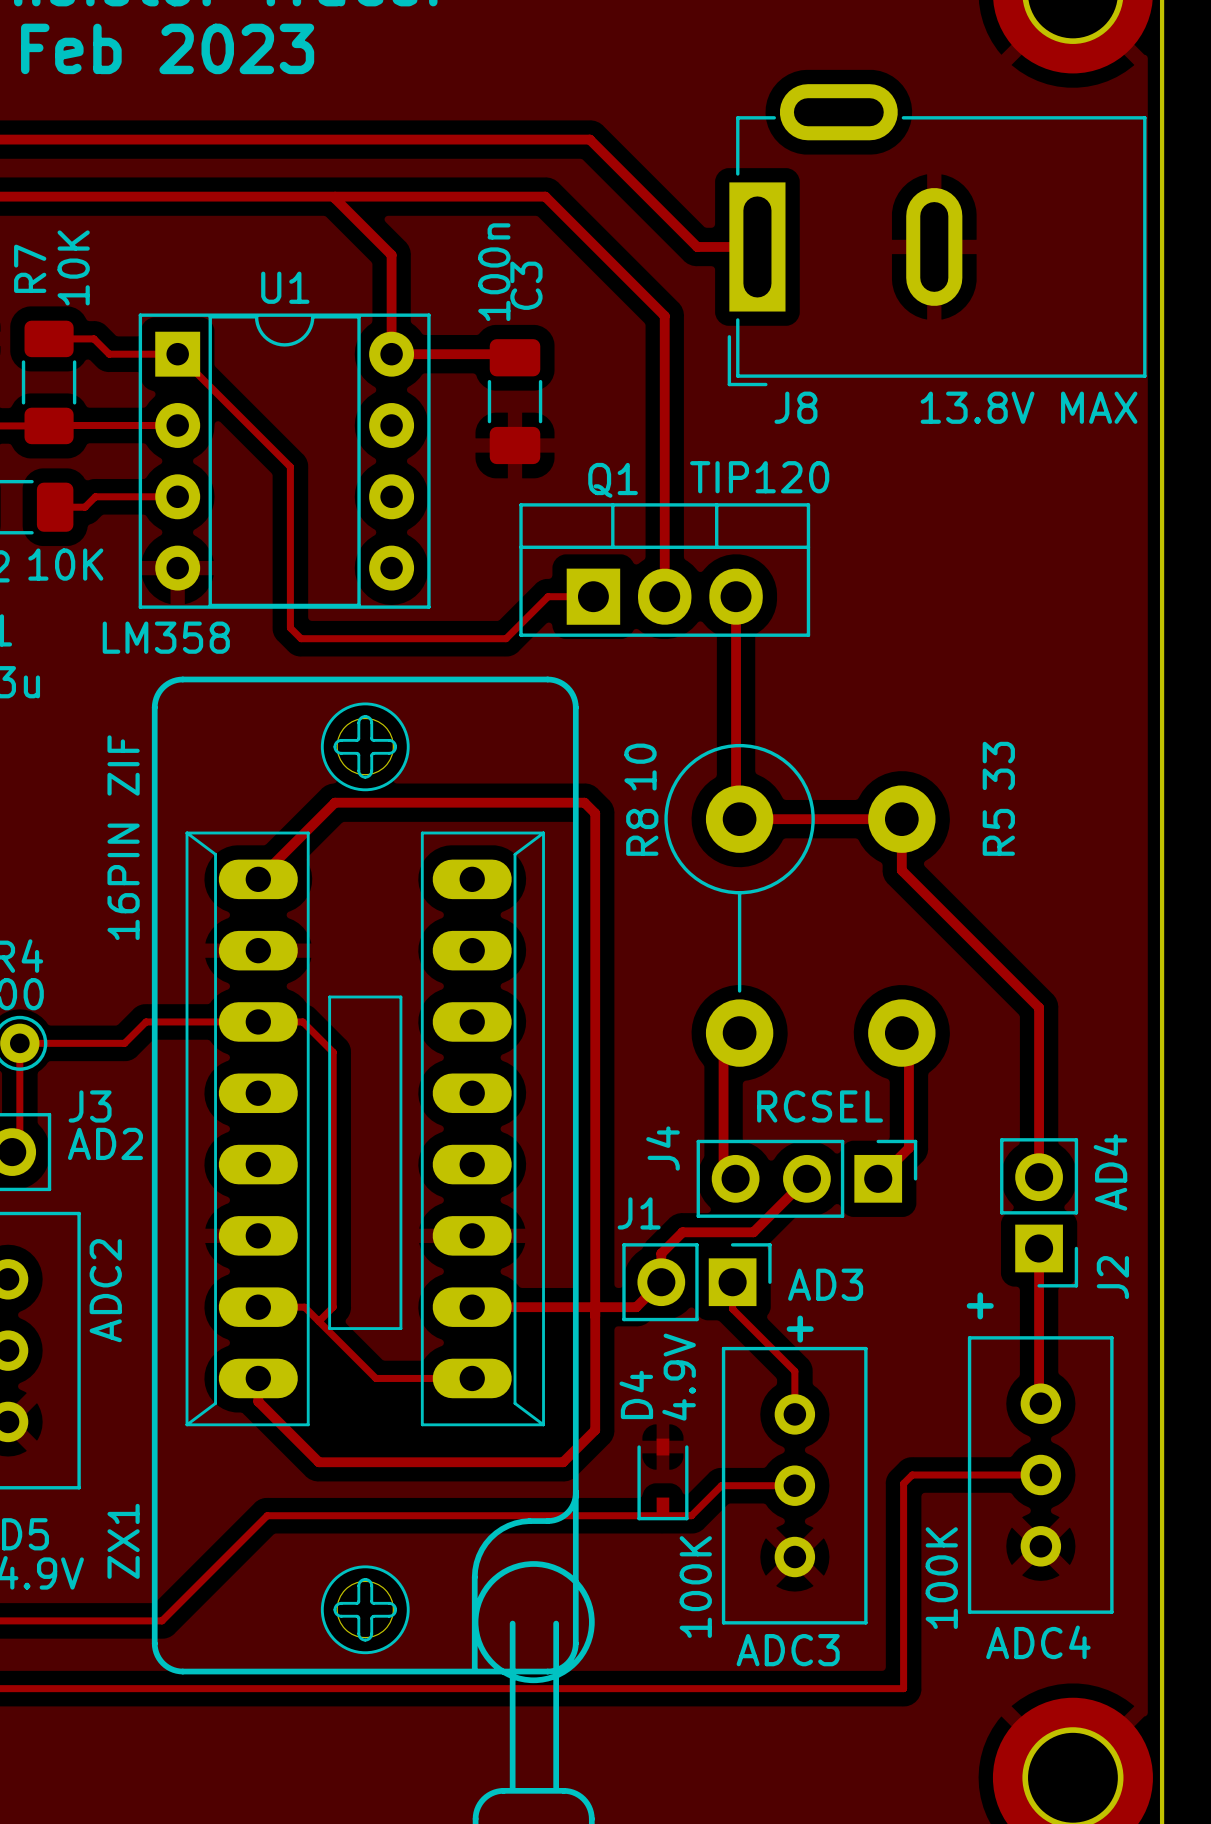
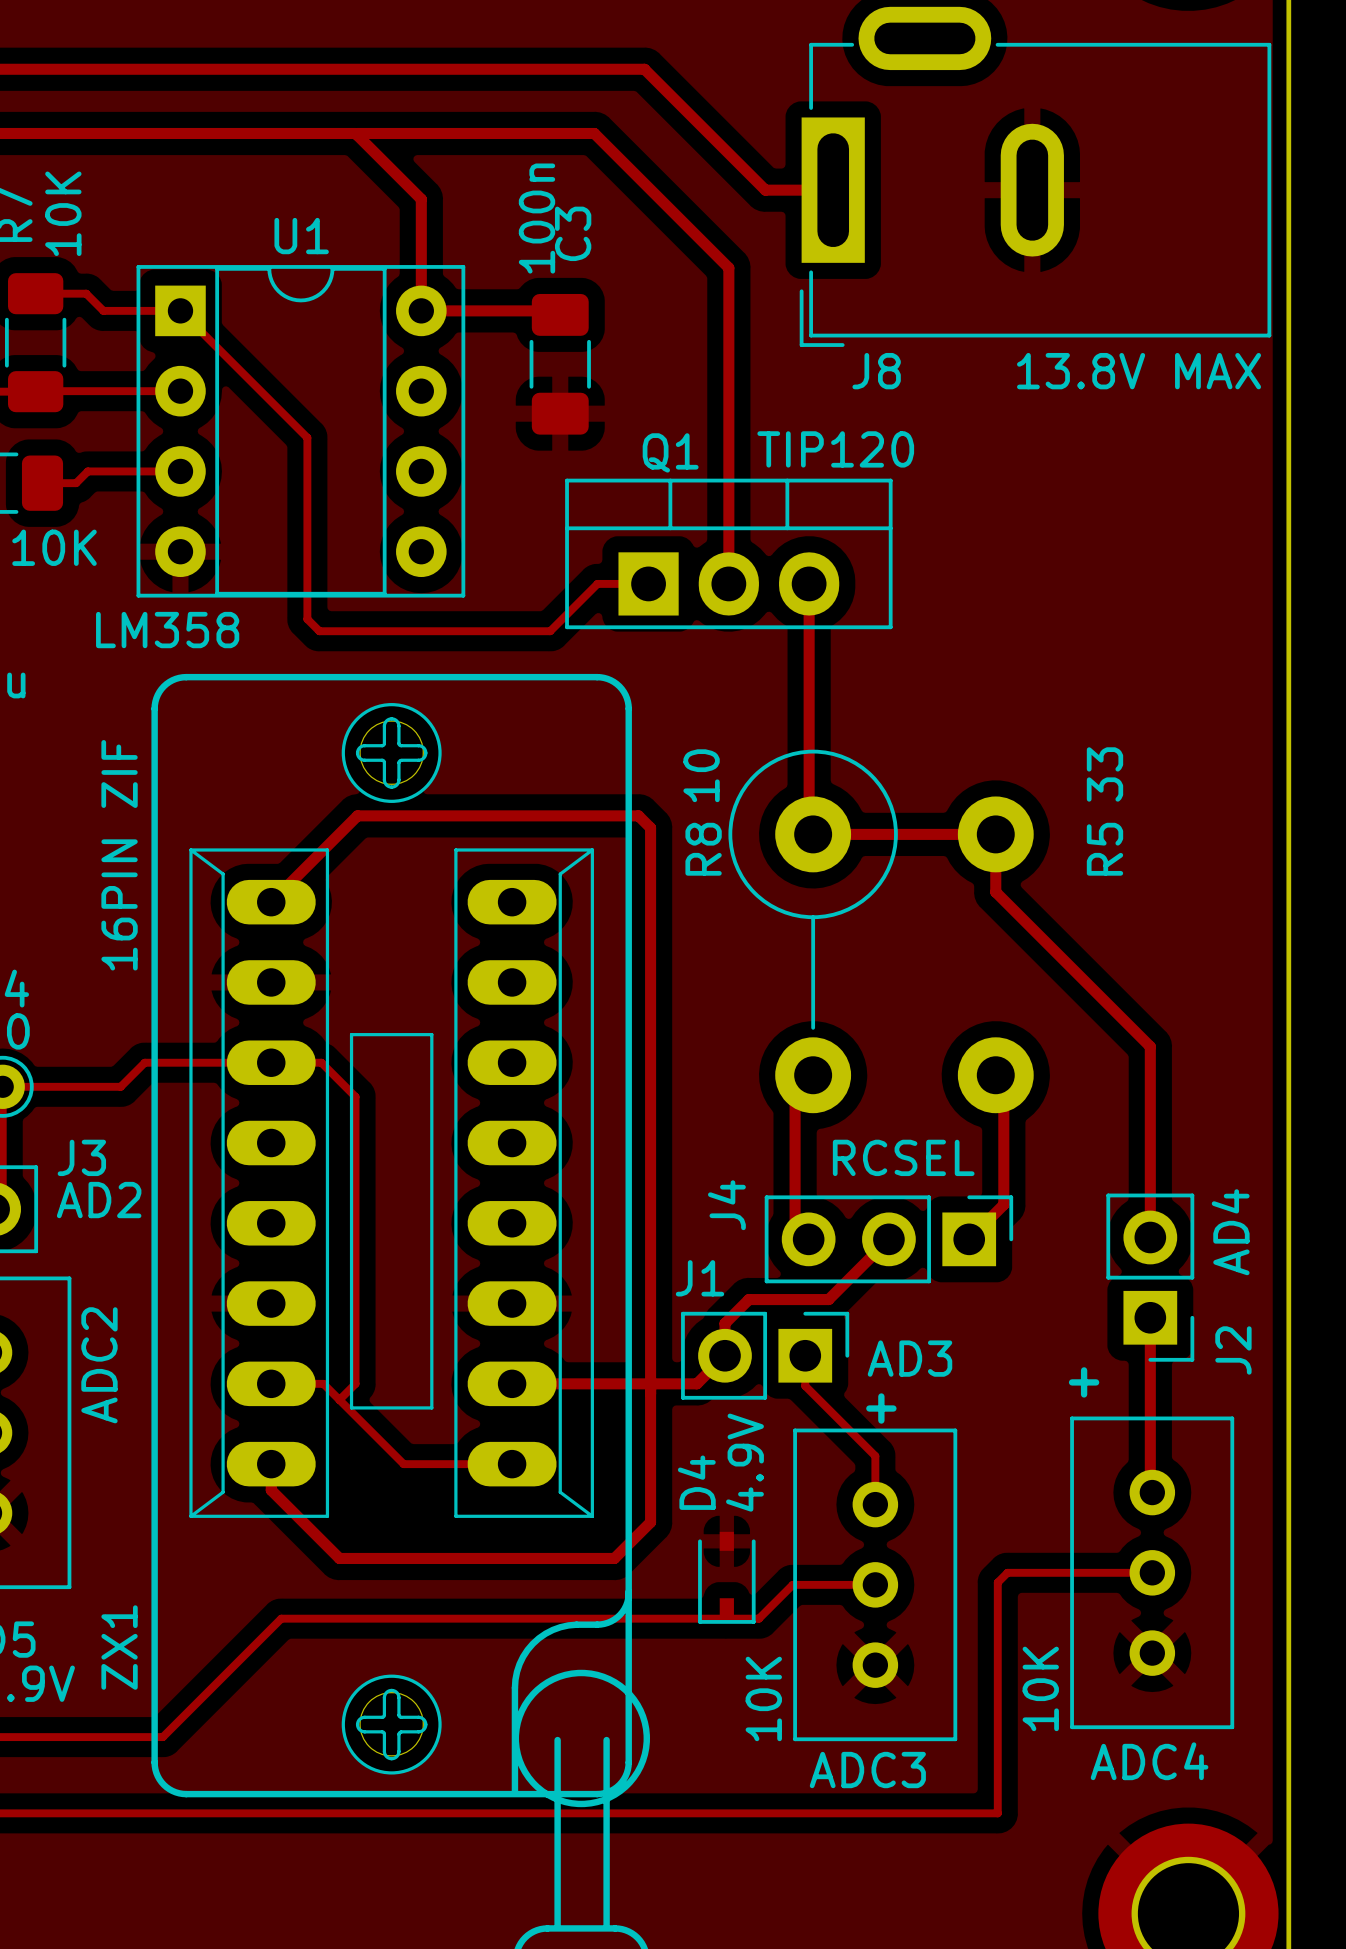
ADC4 value: 100K (941, 1578) -> 10K (1040, 1688)
ADC3 value: 100K (695, 1587) -> 10K (763, 1698)

